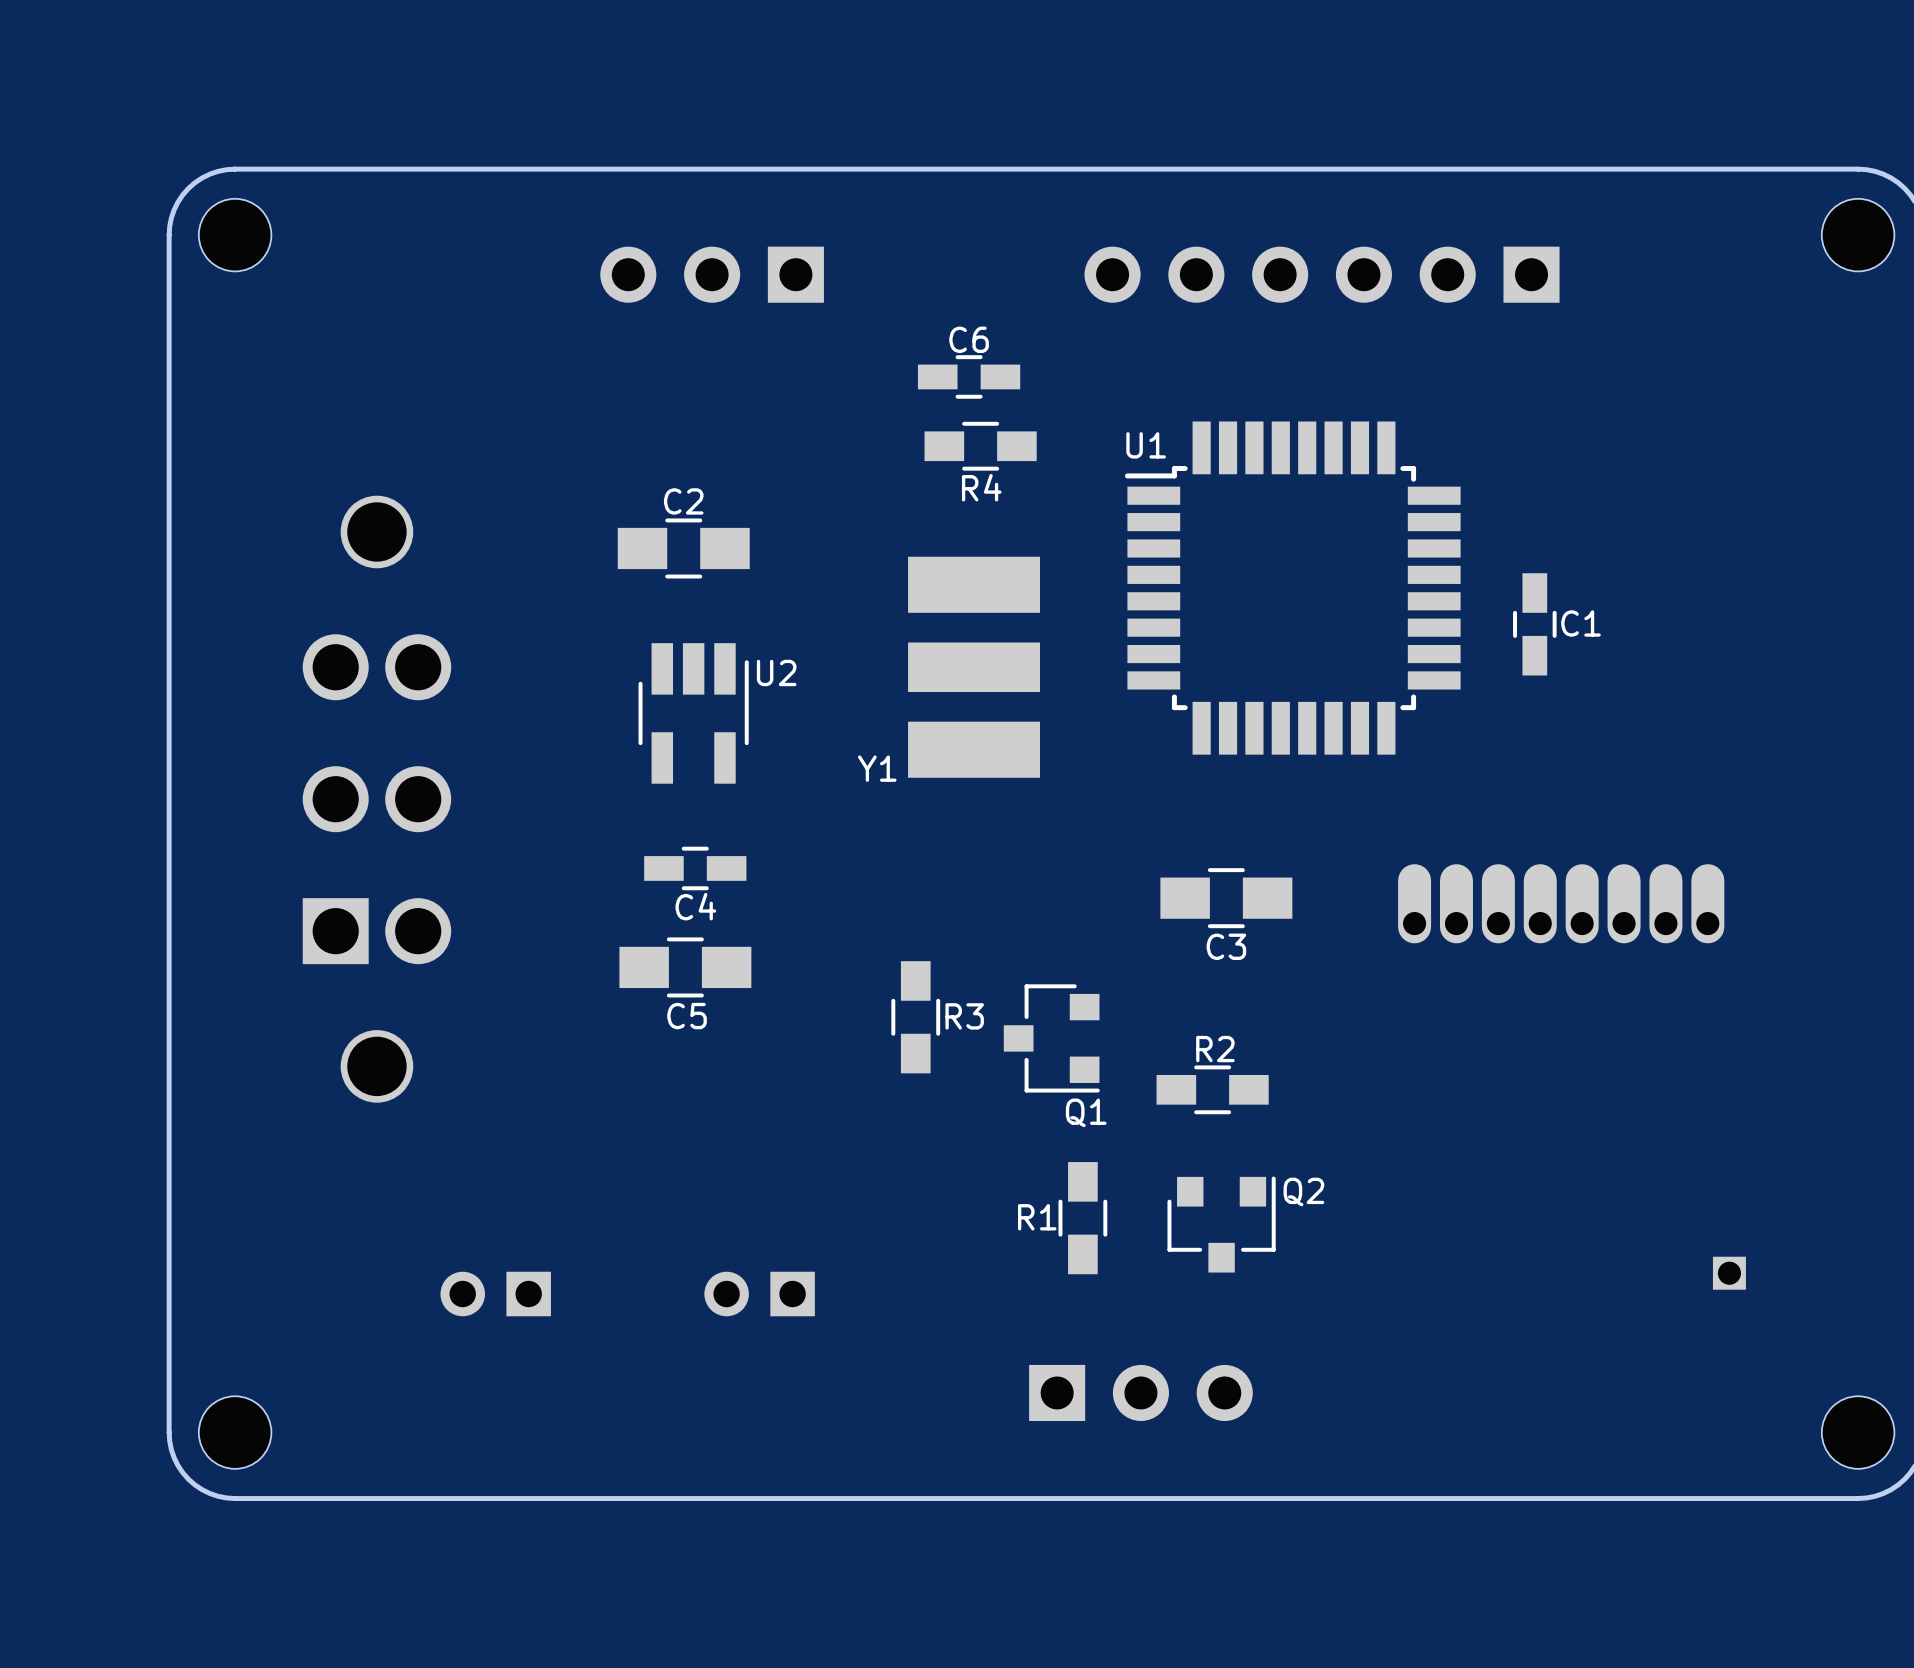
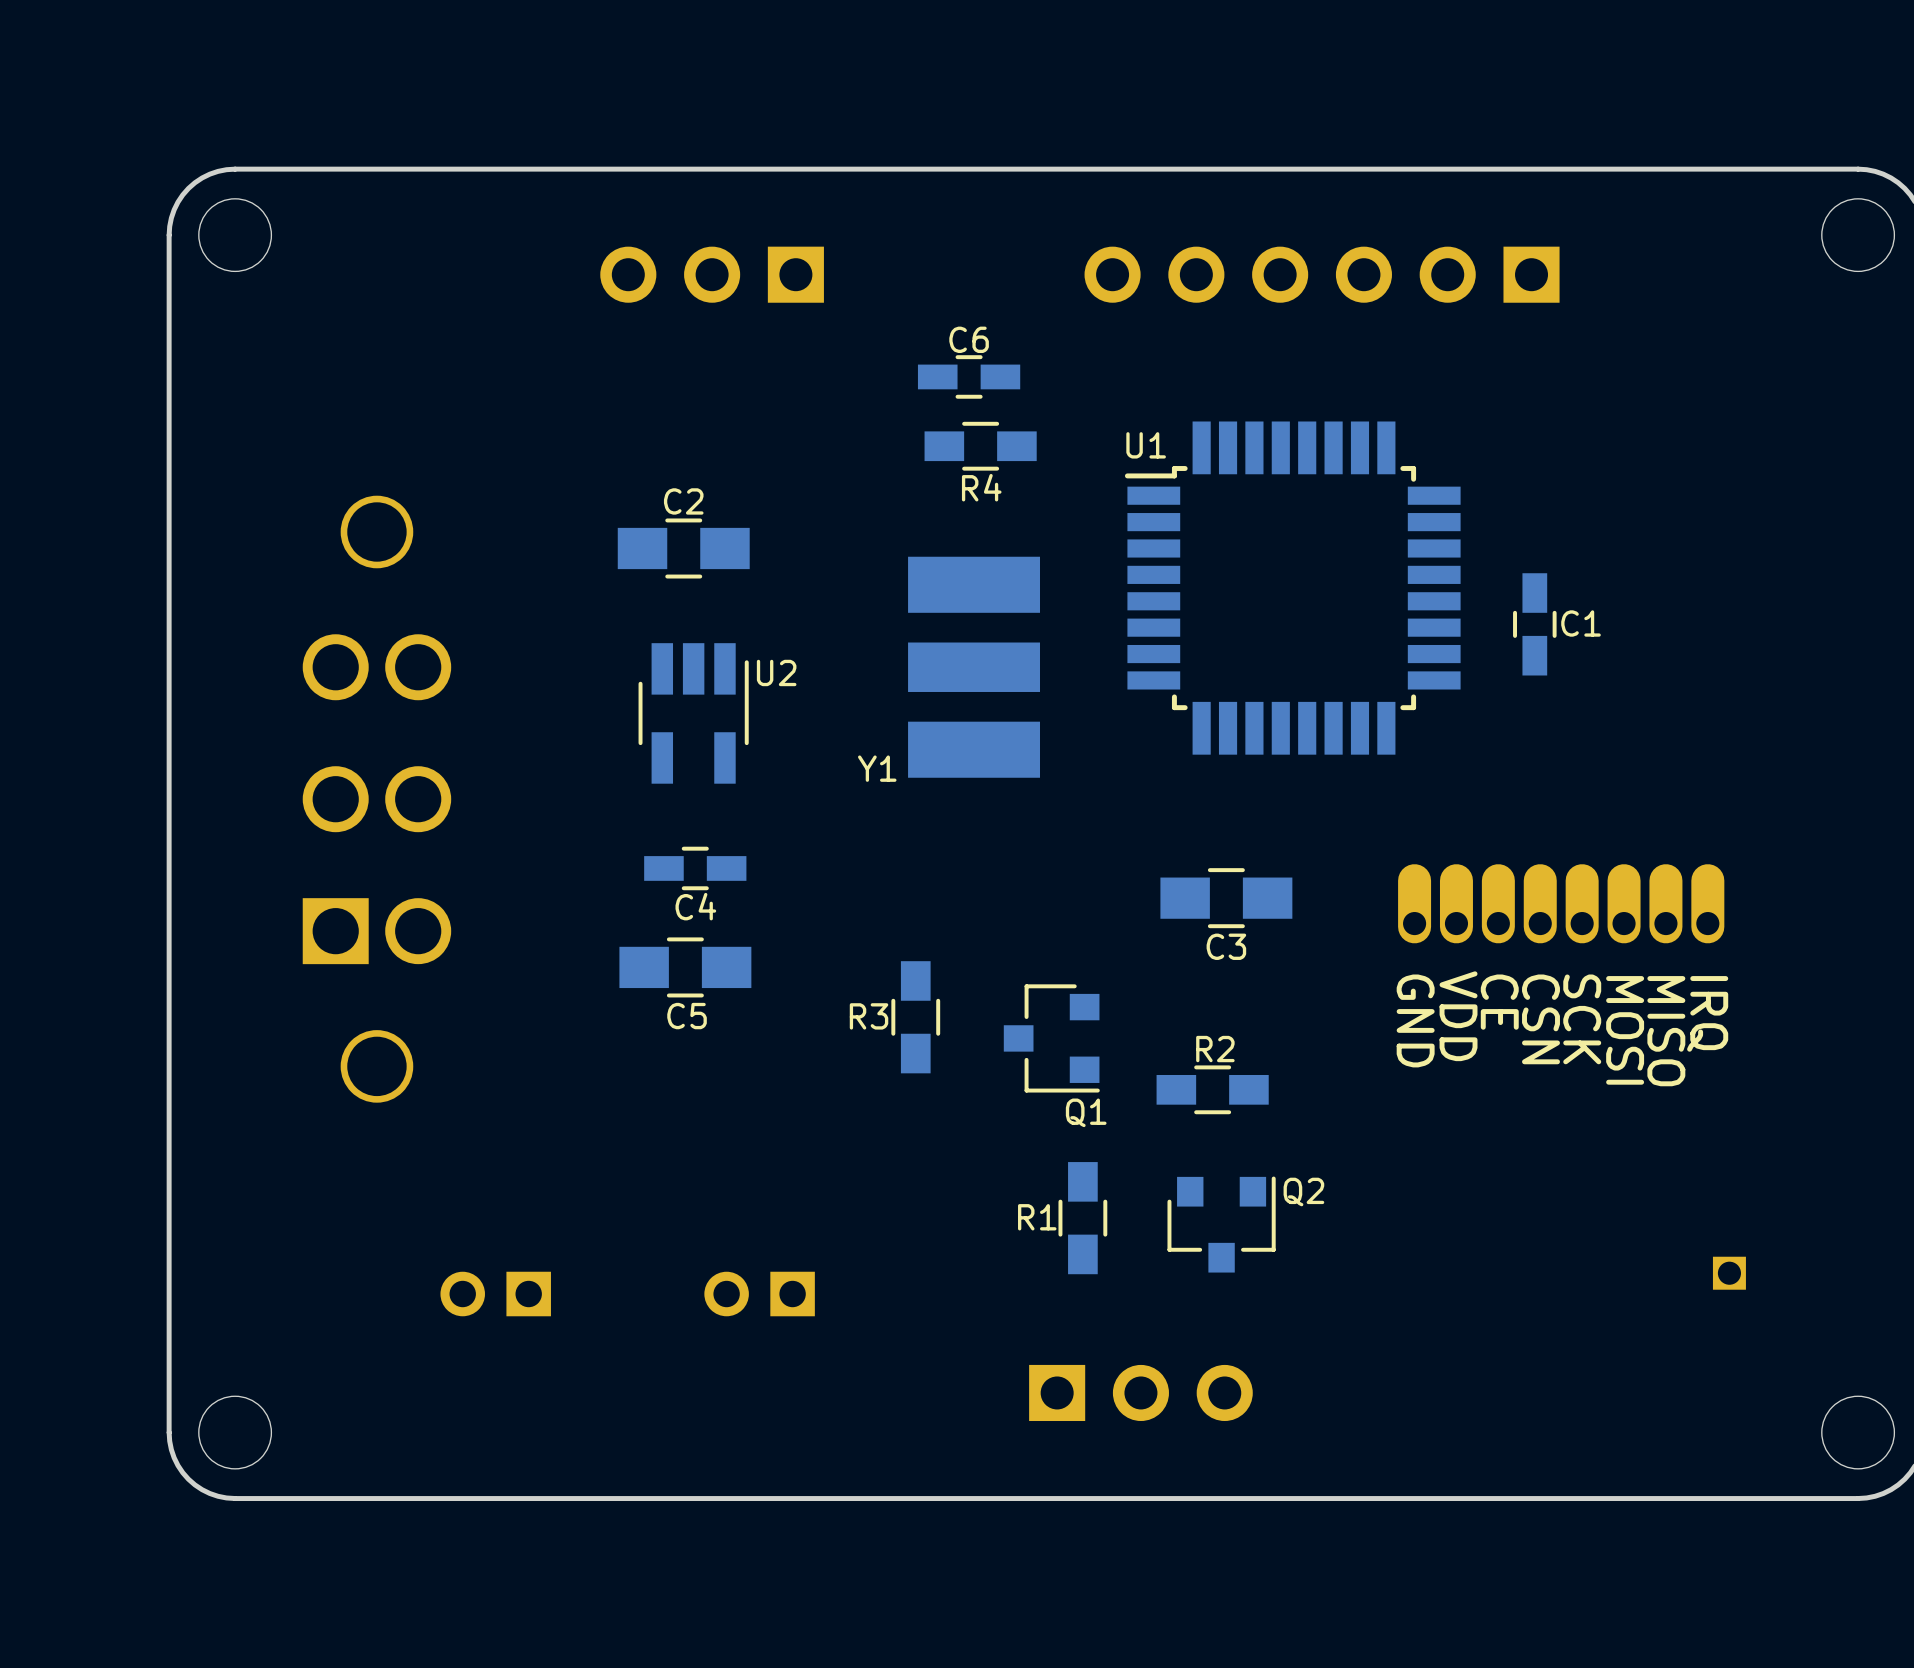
text: none -> CE (1499, 1002)
text: none -> IRQ (1707, 1013)
R3 name position: R3 (964, 1016) -> R3 (869, 1016)
text: none -> VDD (1458, 1016)
text: none -> CSN (1541, 1019)
text: none -> SCK (1582, 1019)
text: none -> GND (1415, 1020)
text: none -> MOSI (1625, 1030)
text: none -> MISO (1666, 1031)

